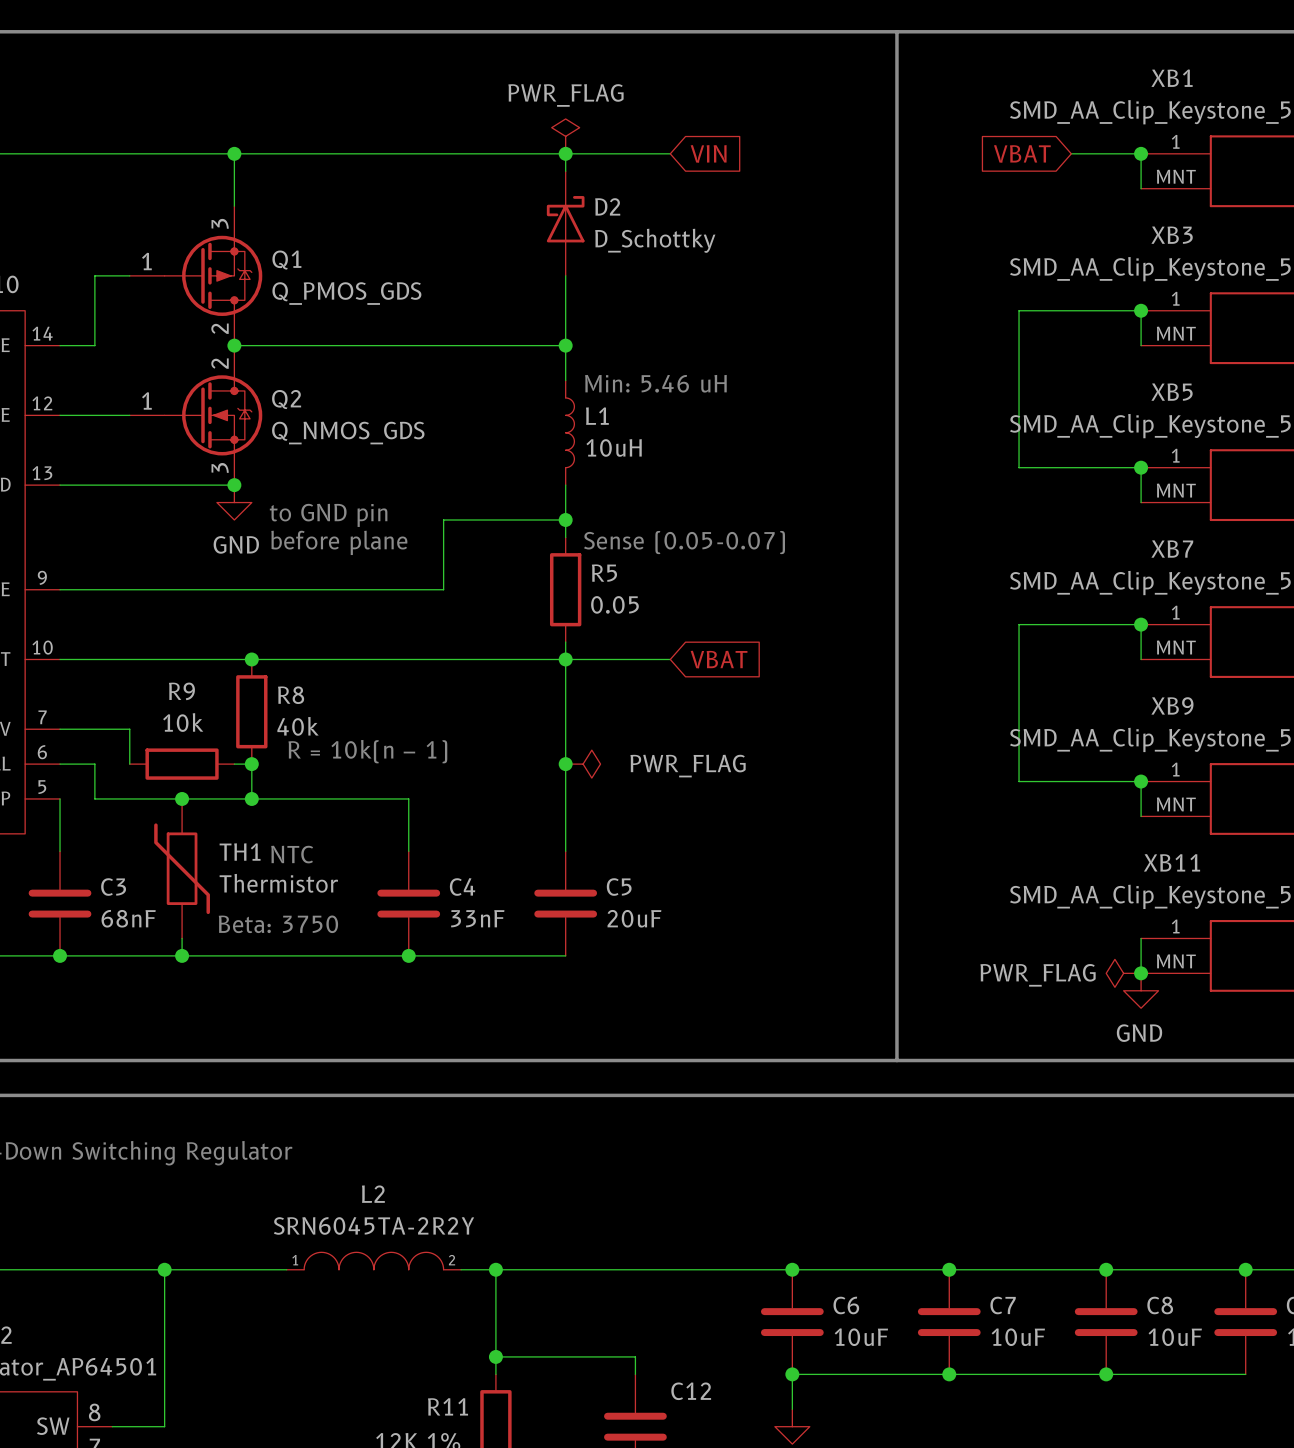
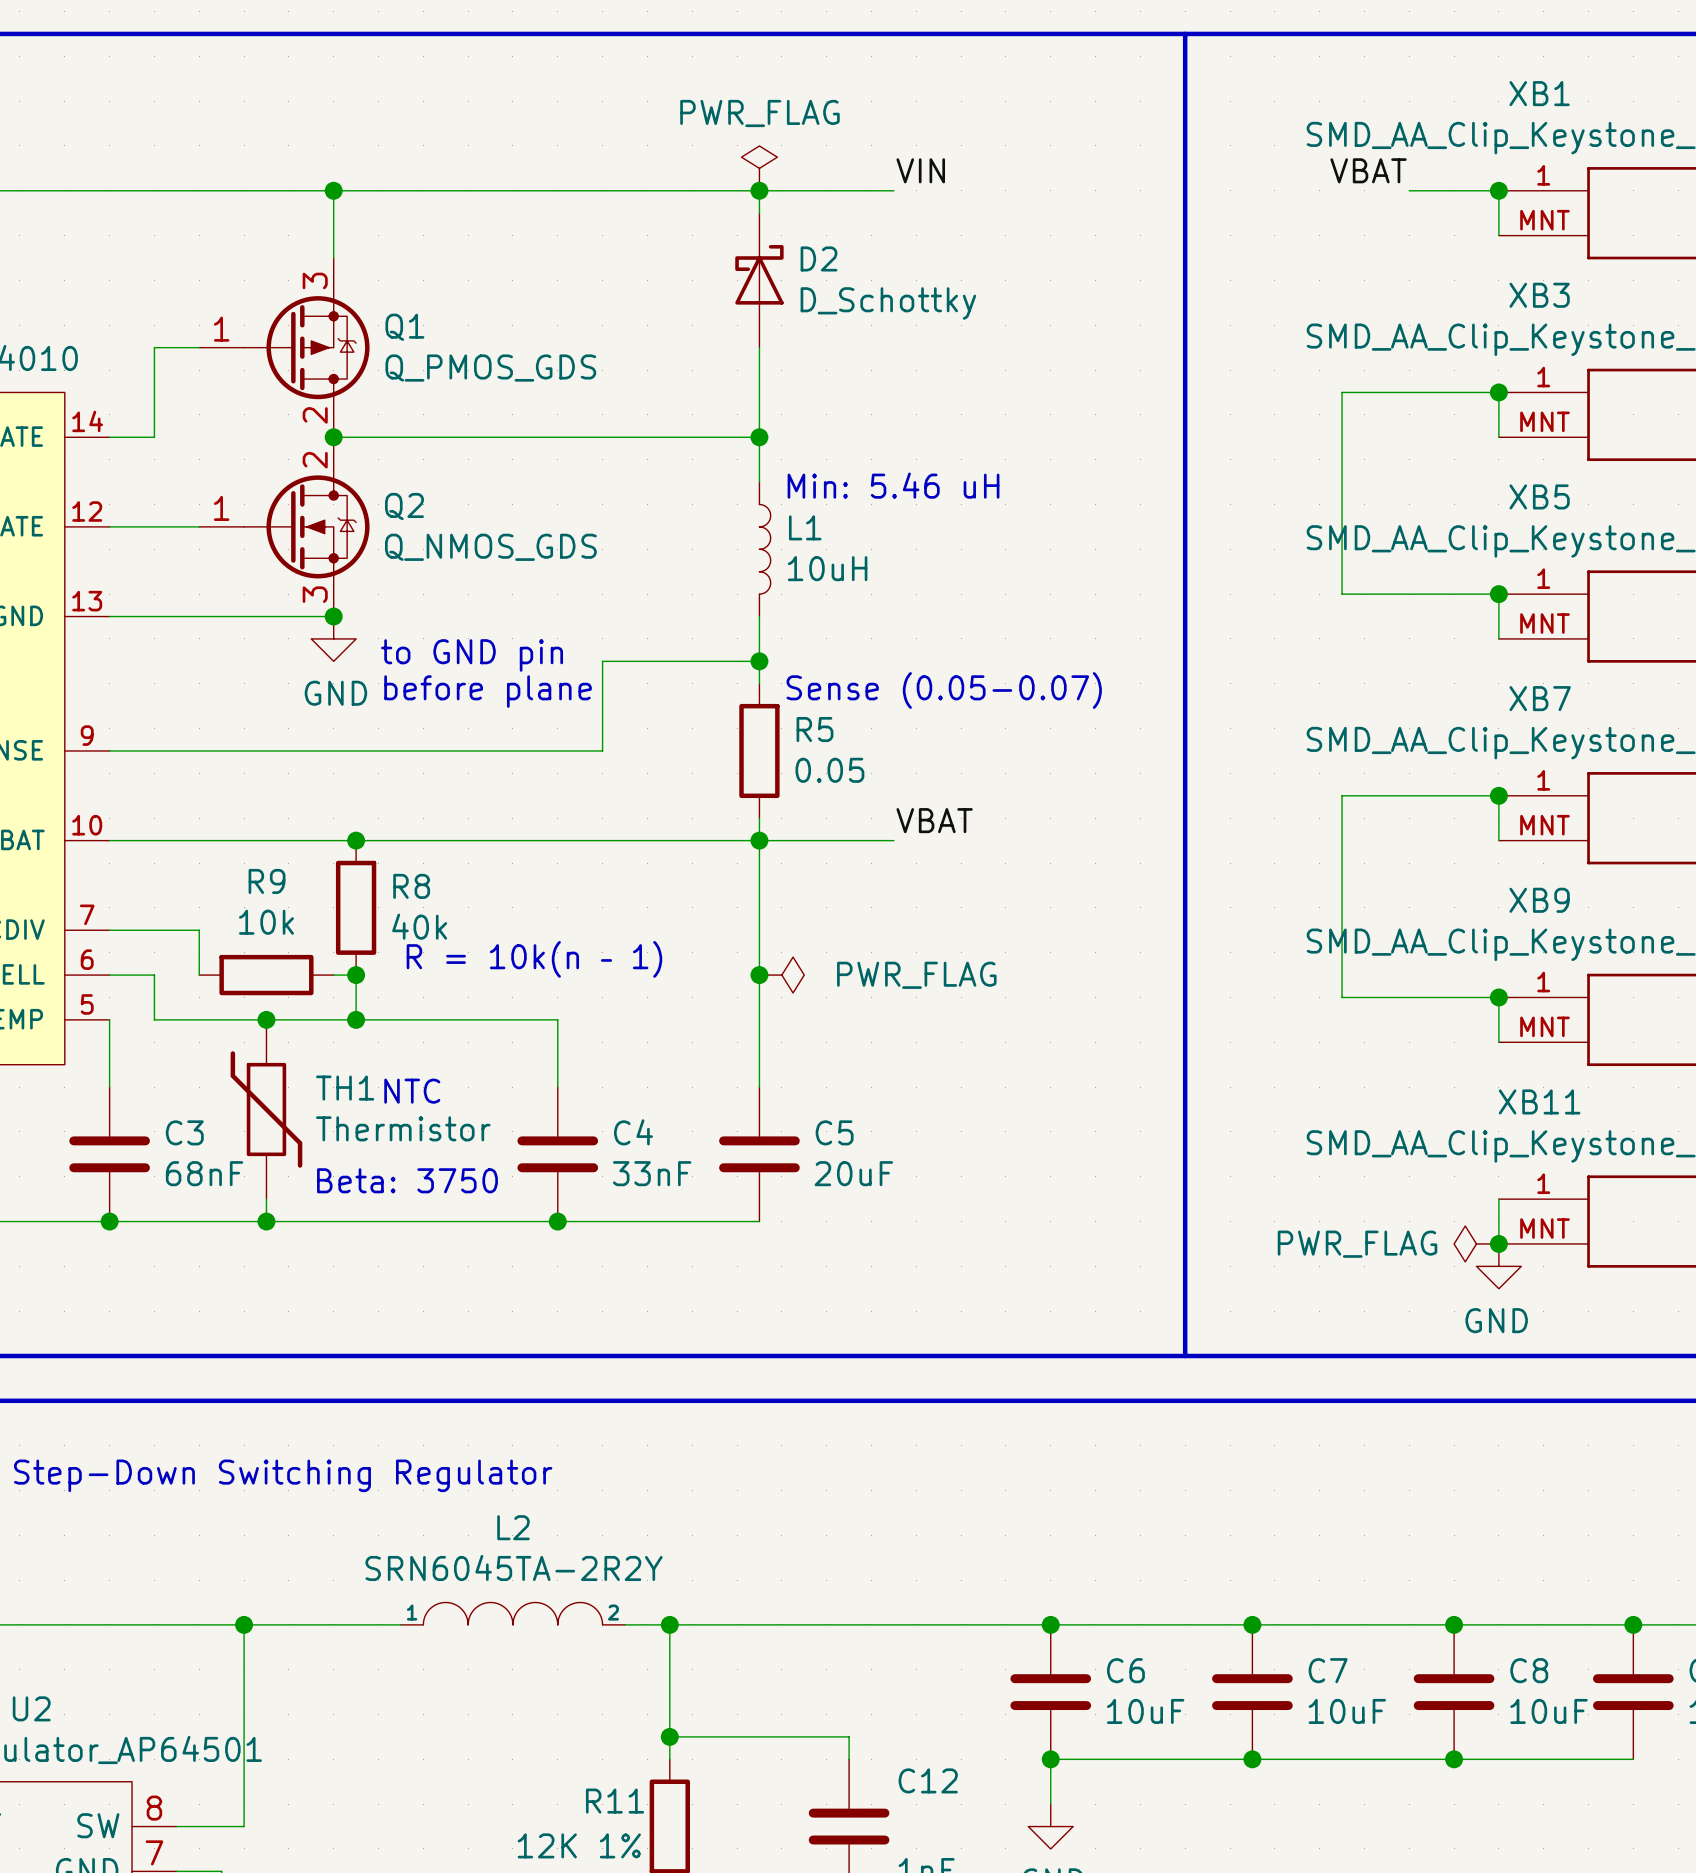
label: none -> VIN (920, 170)
label: none -> VBAT (1368, 170)
global label: VIN (708, 153) -> none
global label: VBAT (1022, 153) -> none
label: none -> VBAT (934, 820)
global label: VBAT (719, 659) -> none

